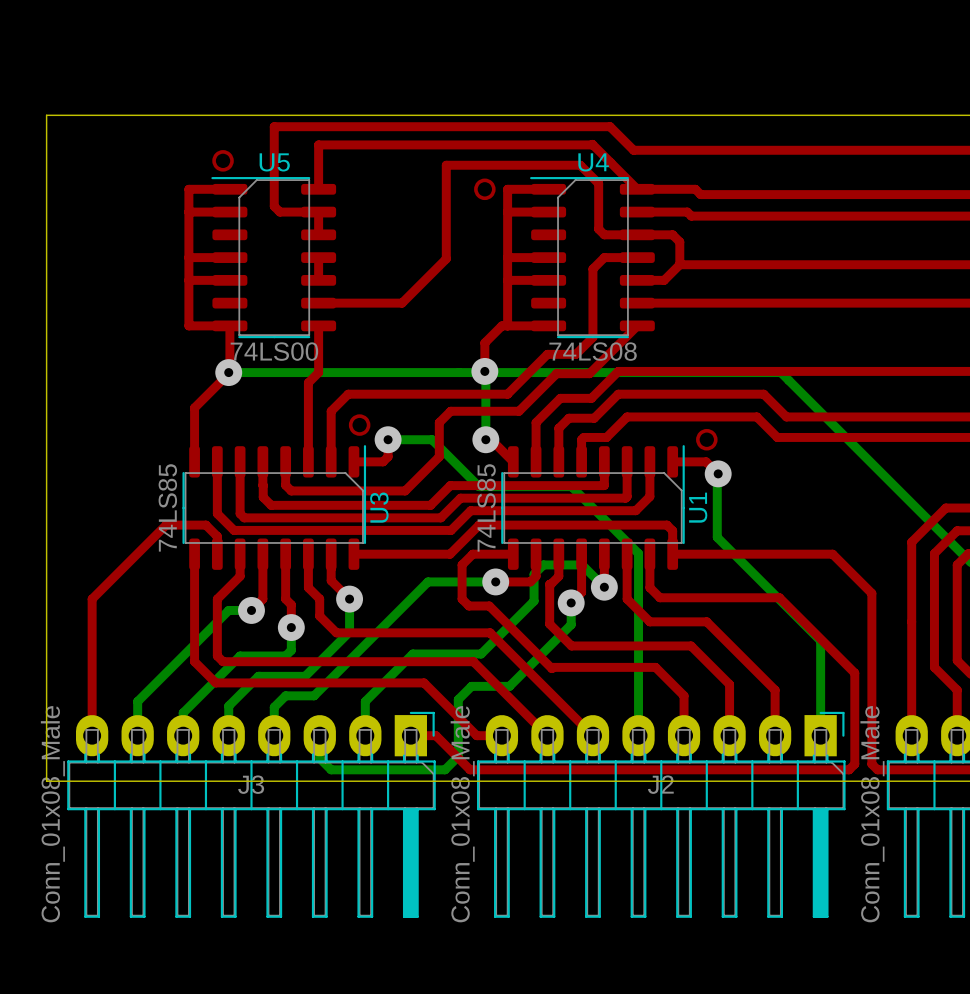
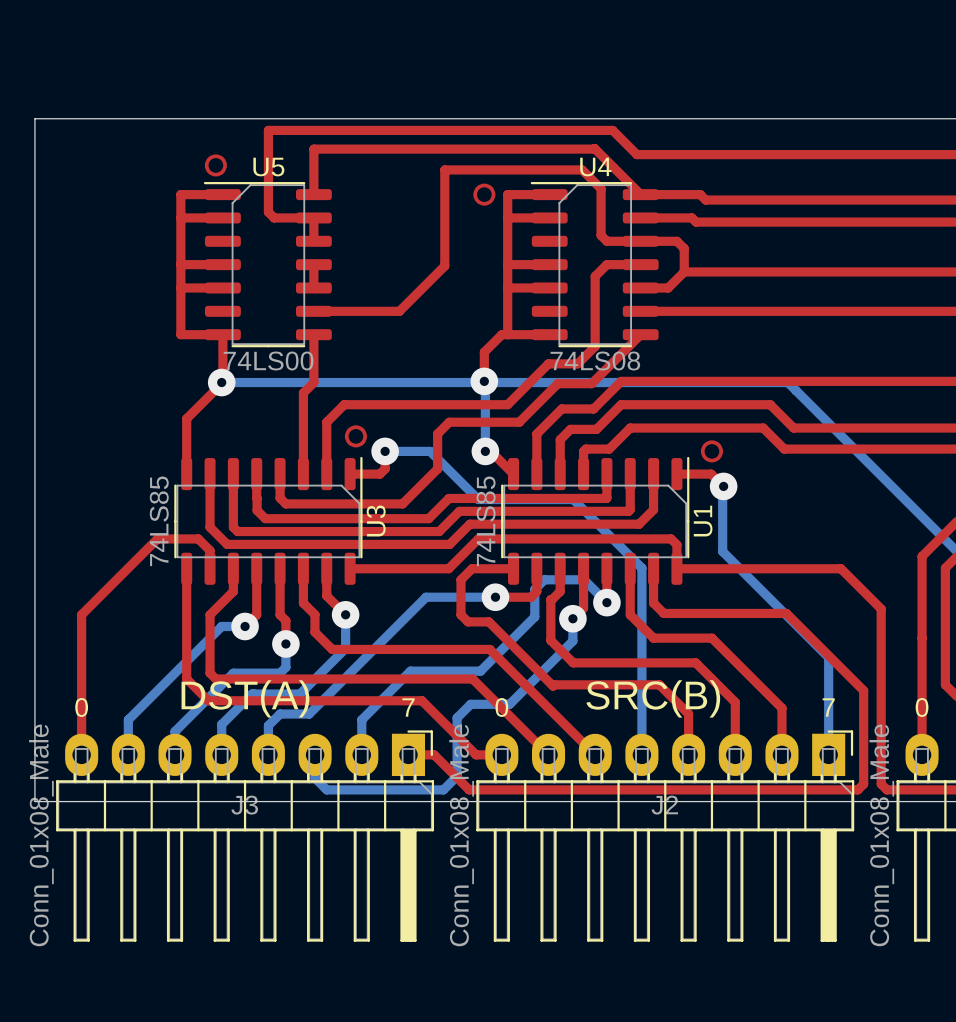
text: none -> DST(A) (245, 698)
text: none -> SRC(B) (653, 698)
text: none -> 0 (81, 707)
text: none -> 7 (408, 707)
text: none -> 0 (501, 707)
text: none -> 7 (828, 707)
text: none -> 0 (922, 707)

